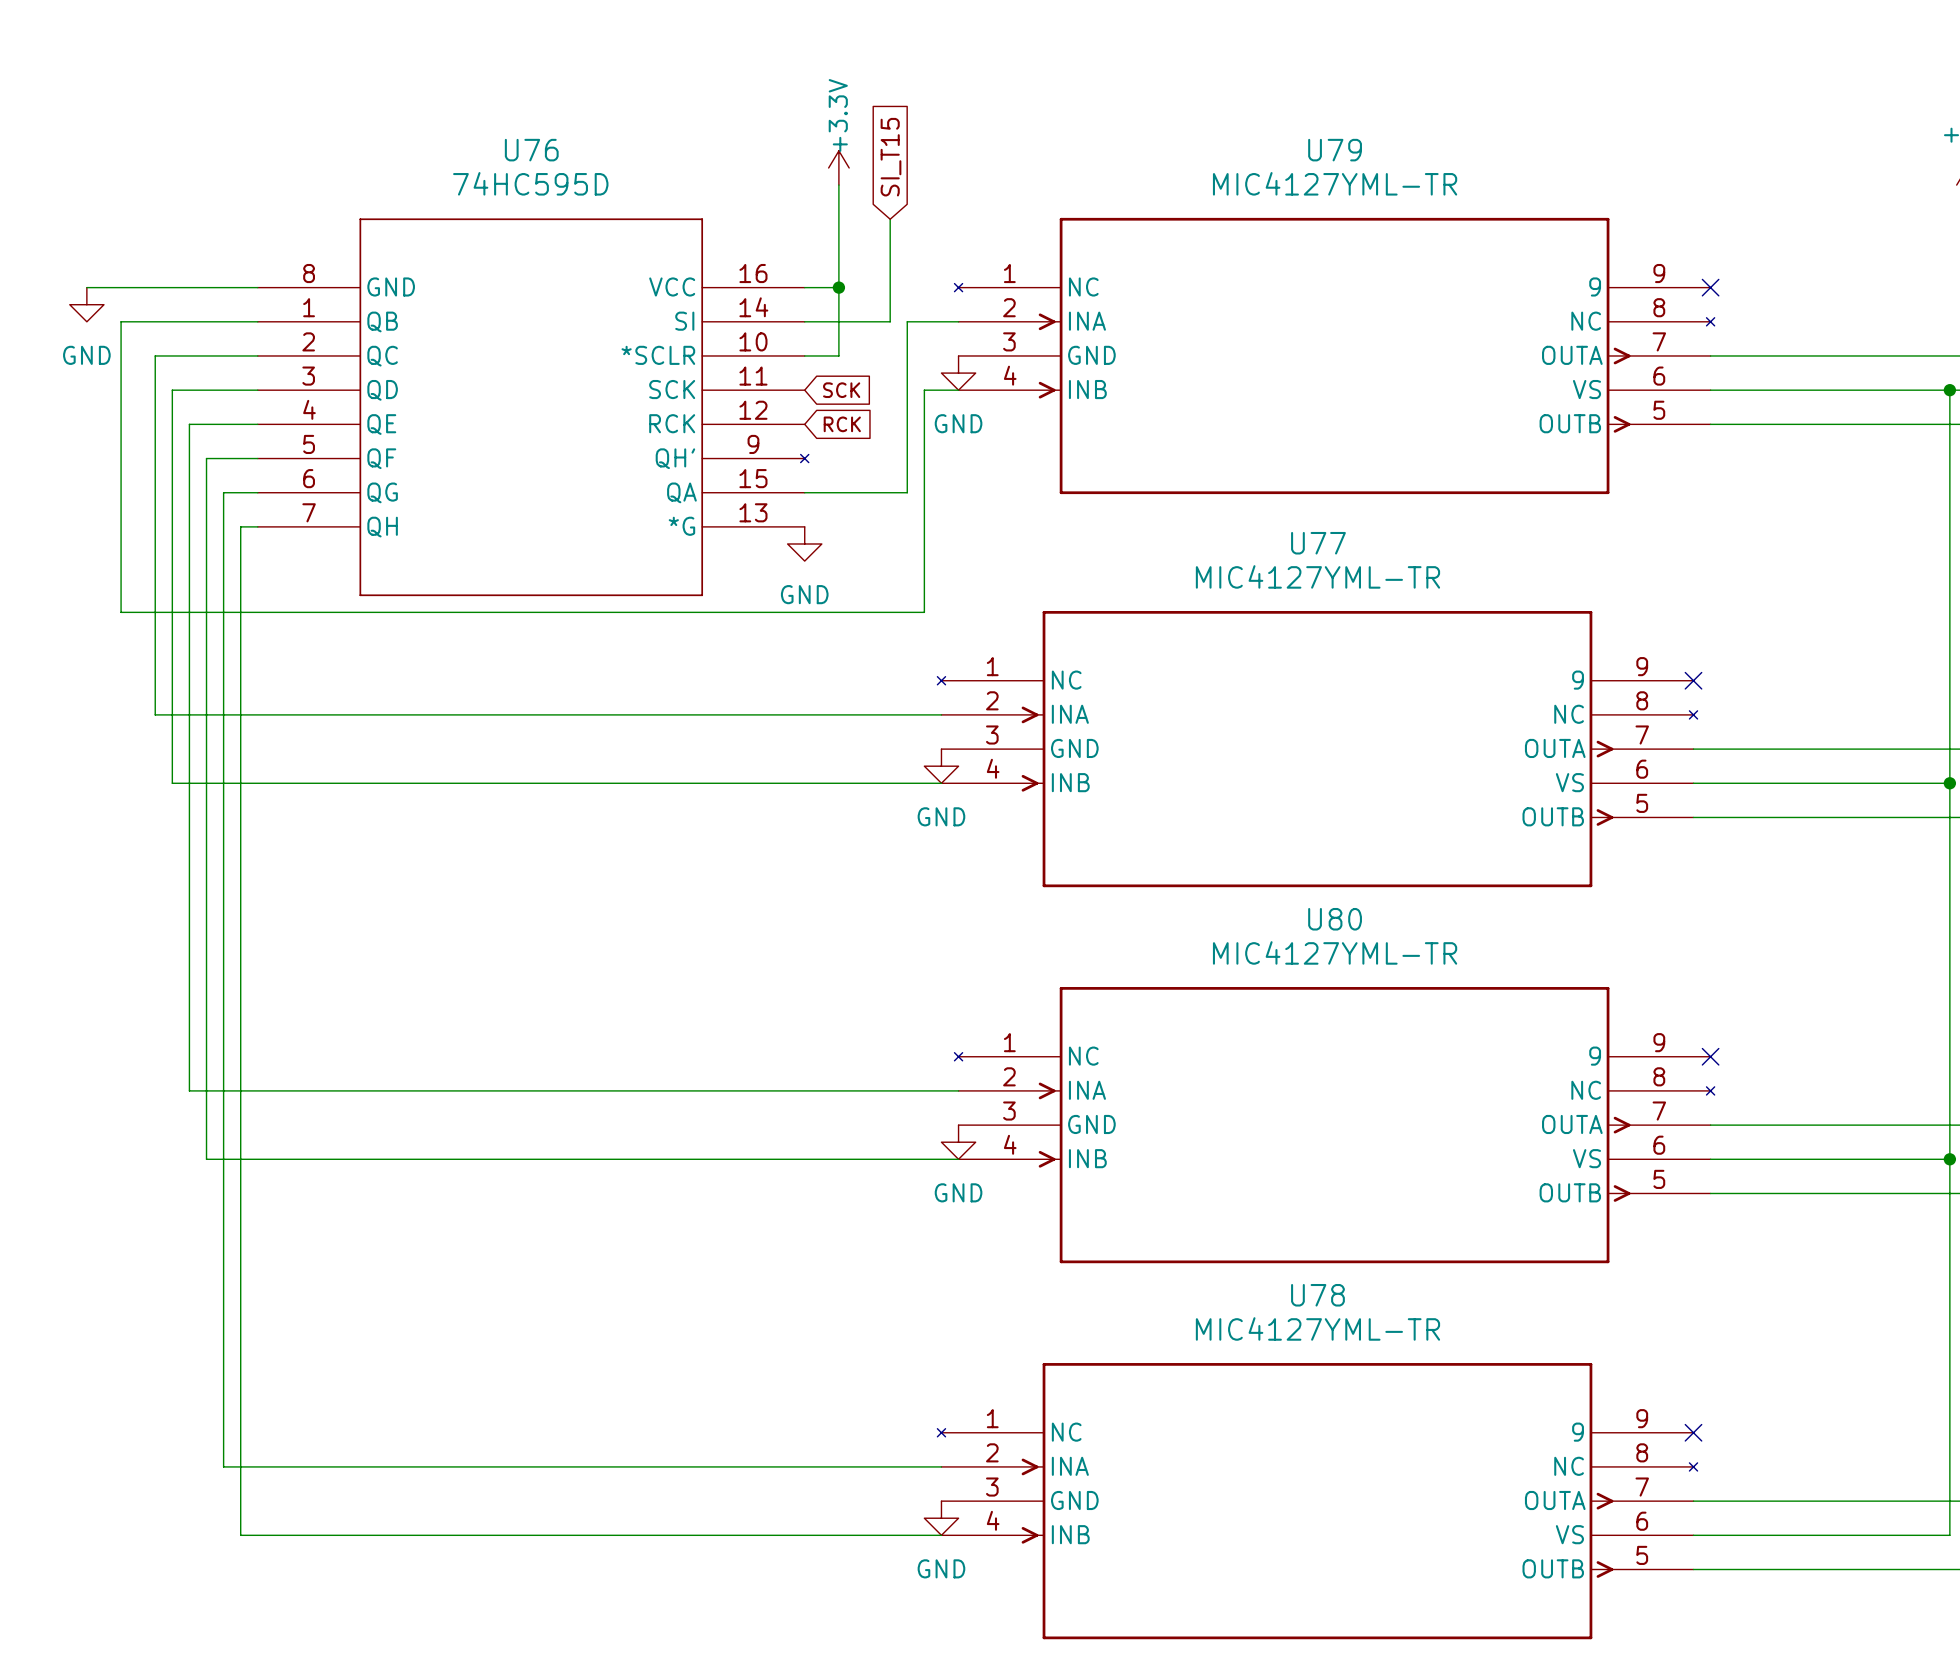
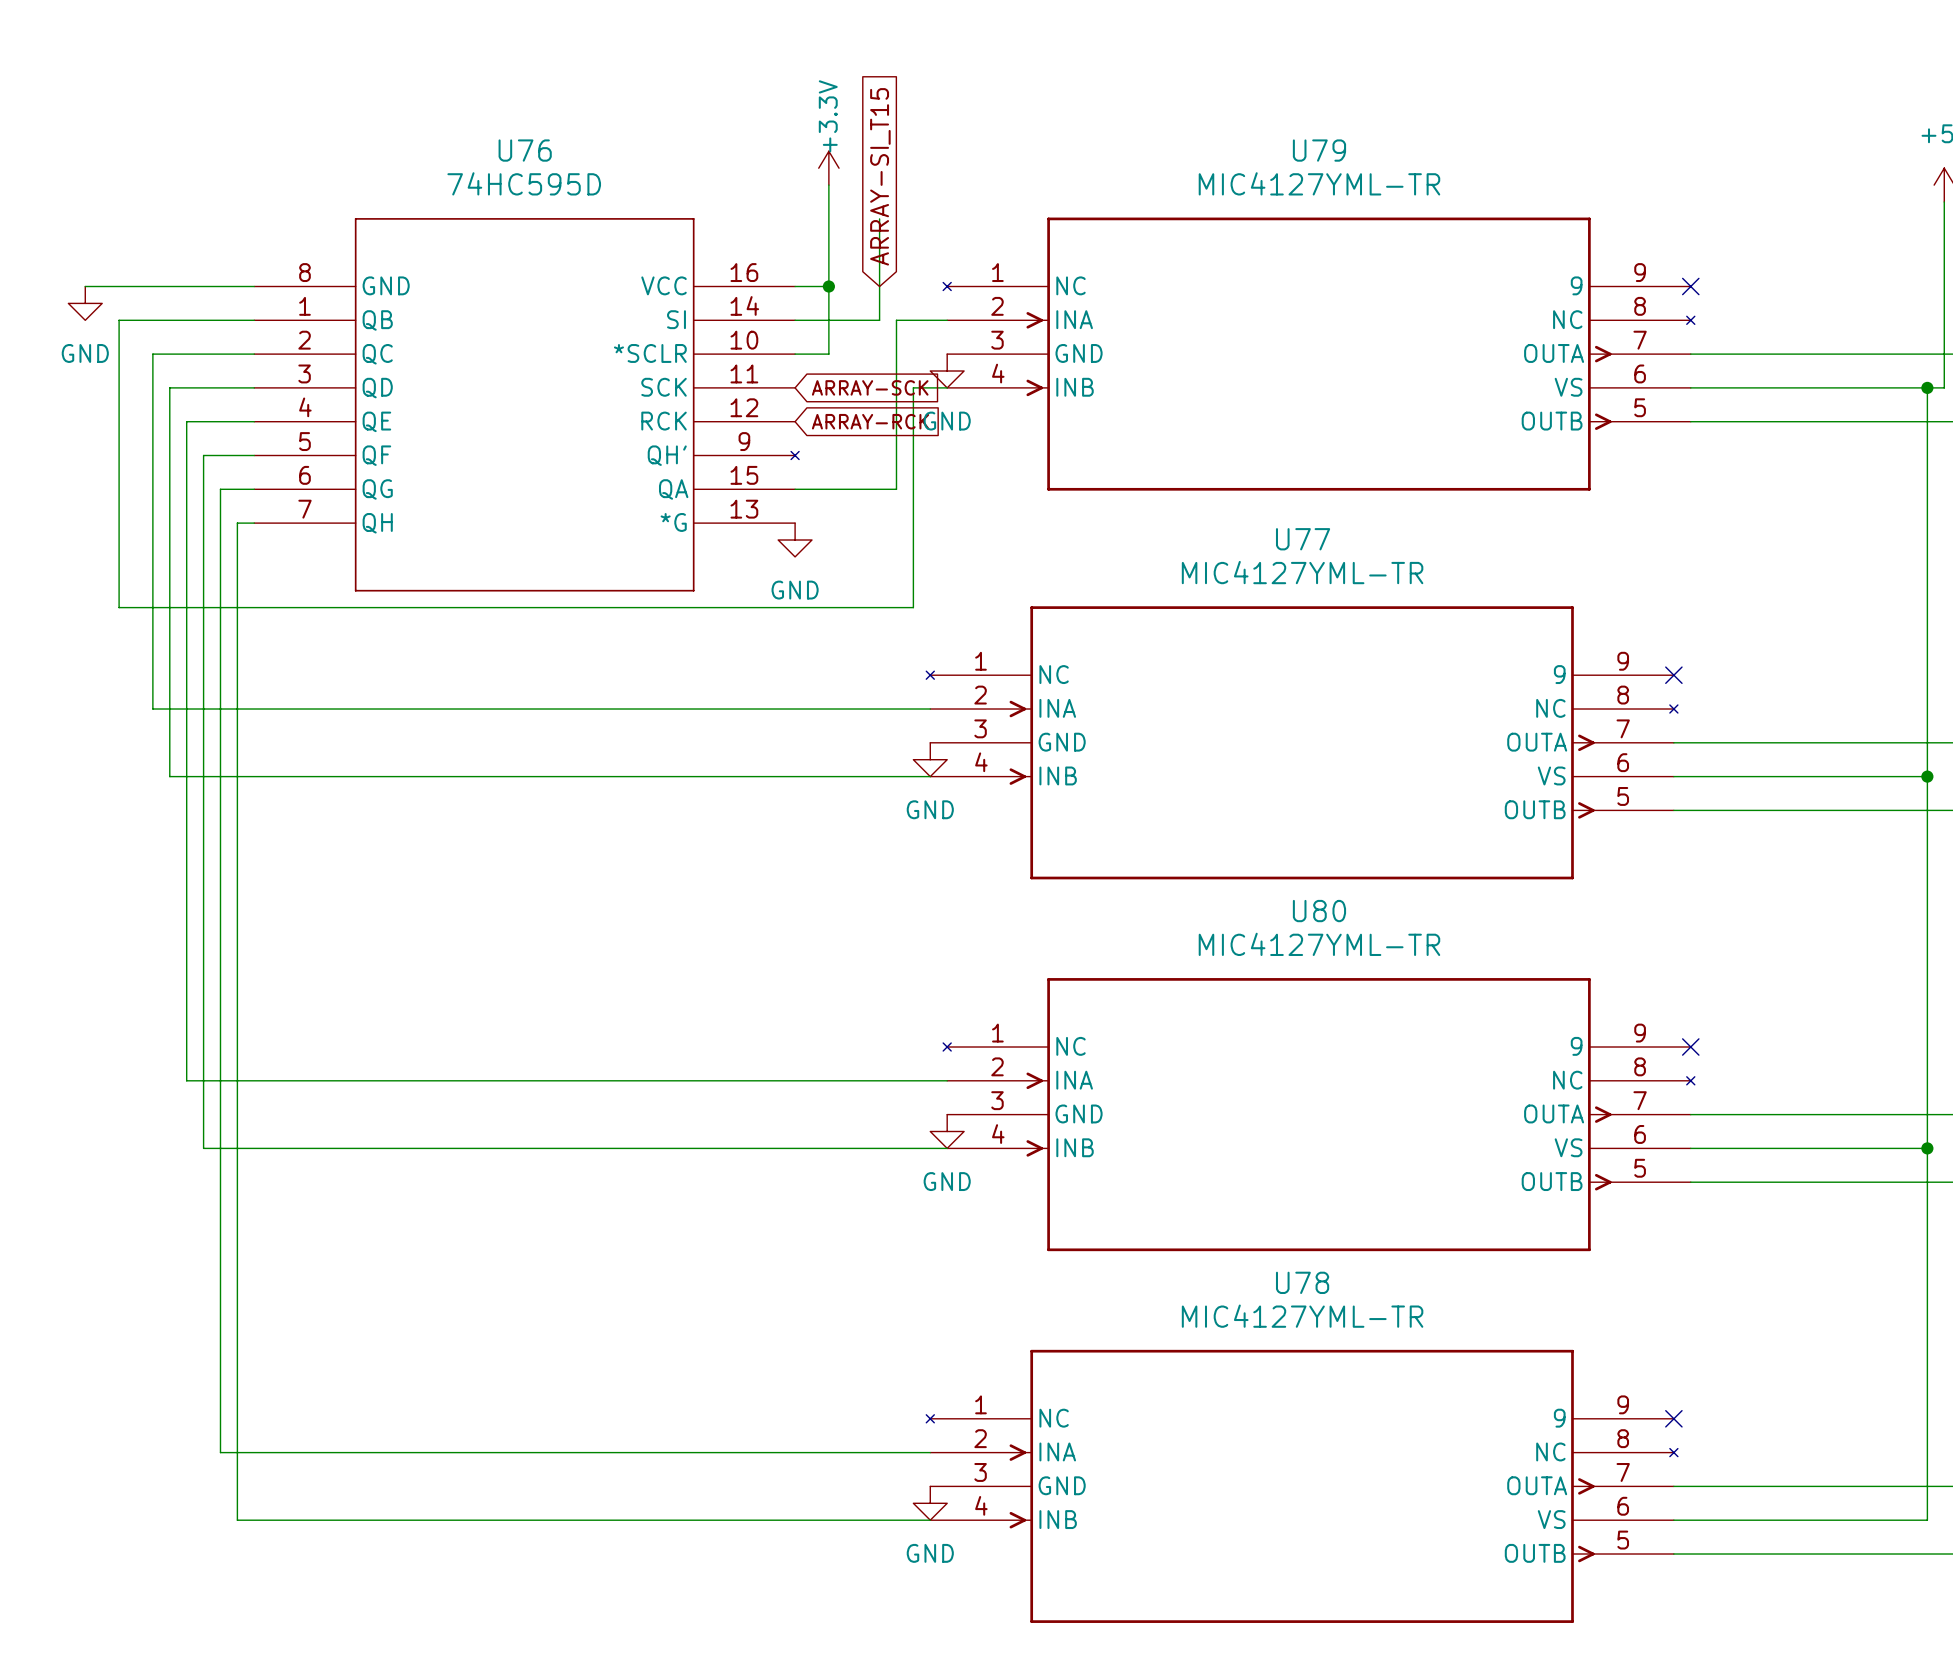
global label: SI_T15 (891, 157) -> ARRAY-SI_T15 (880, 176)
global label: SCK (841, 390) -> ARRAY-SCK (870, 387)
global label: RCK (842, 424) -> ARRAY-RCK (870, 421)

